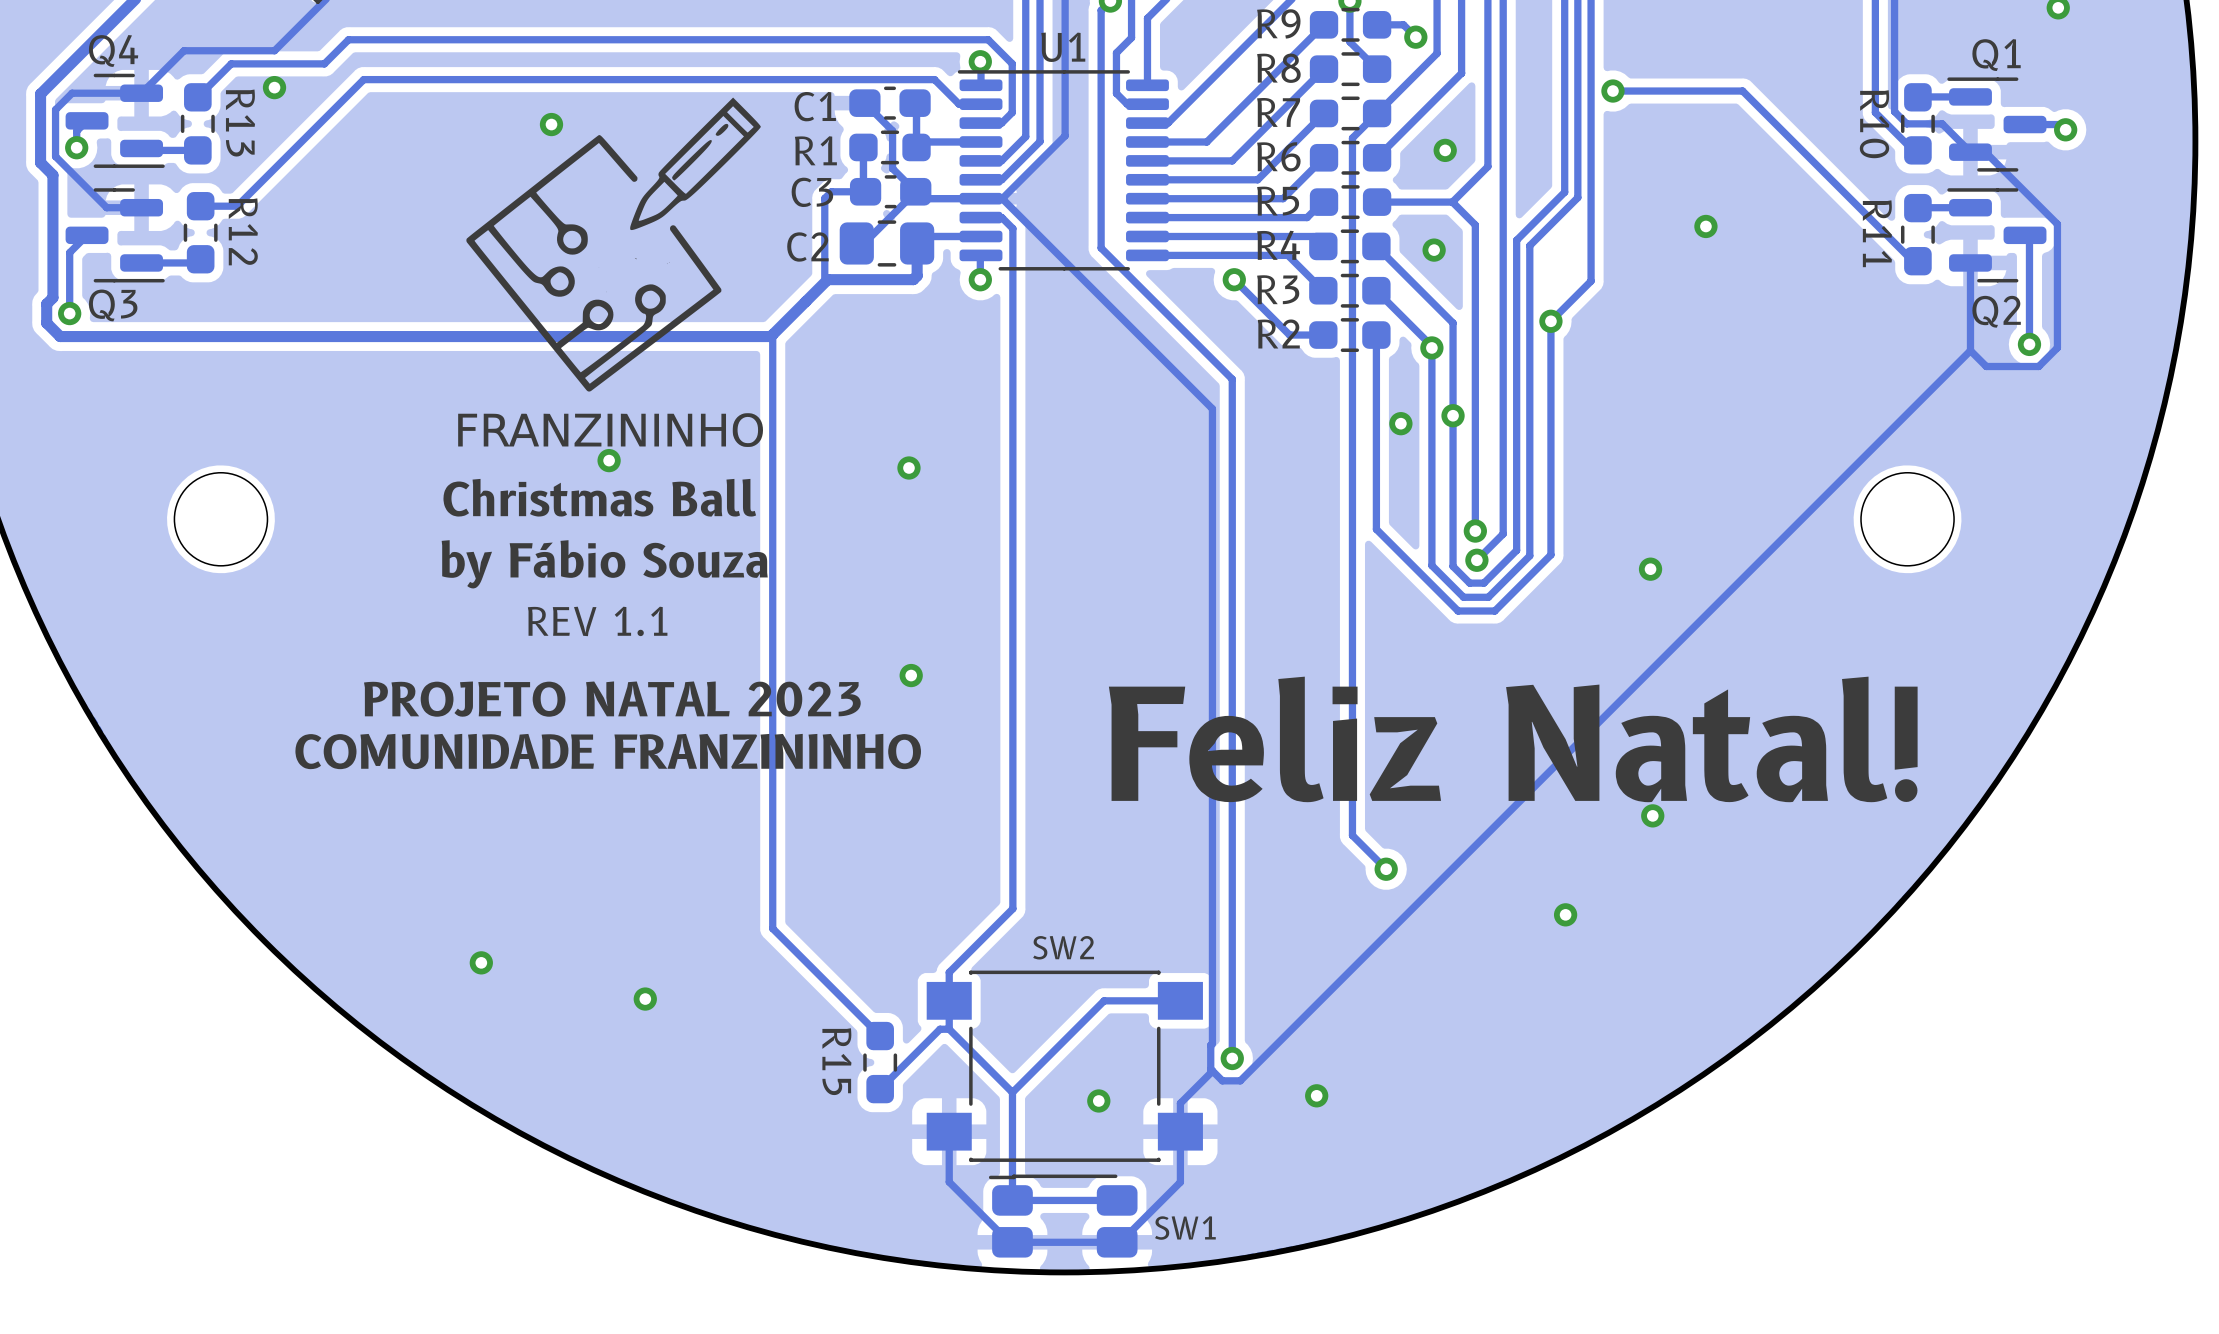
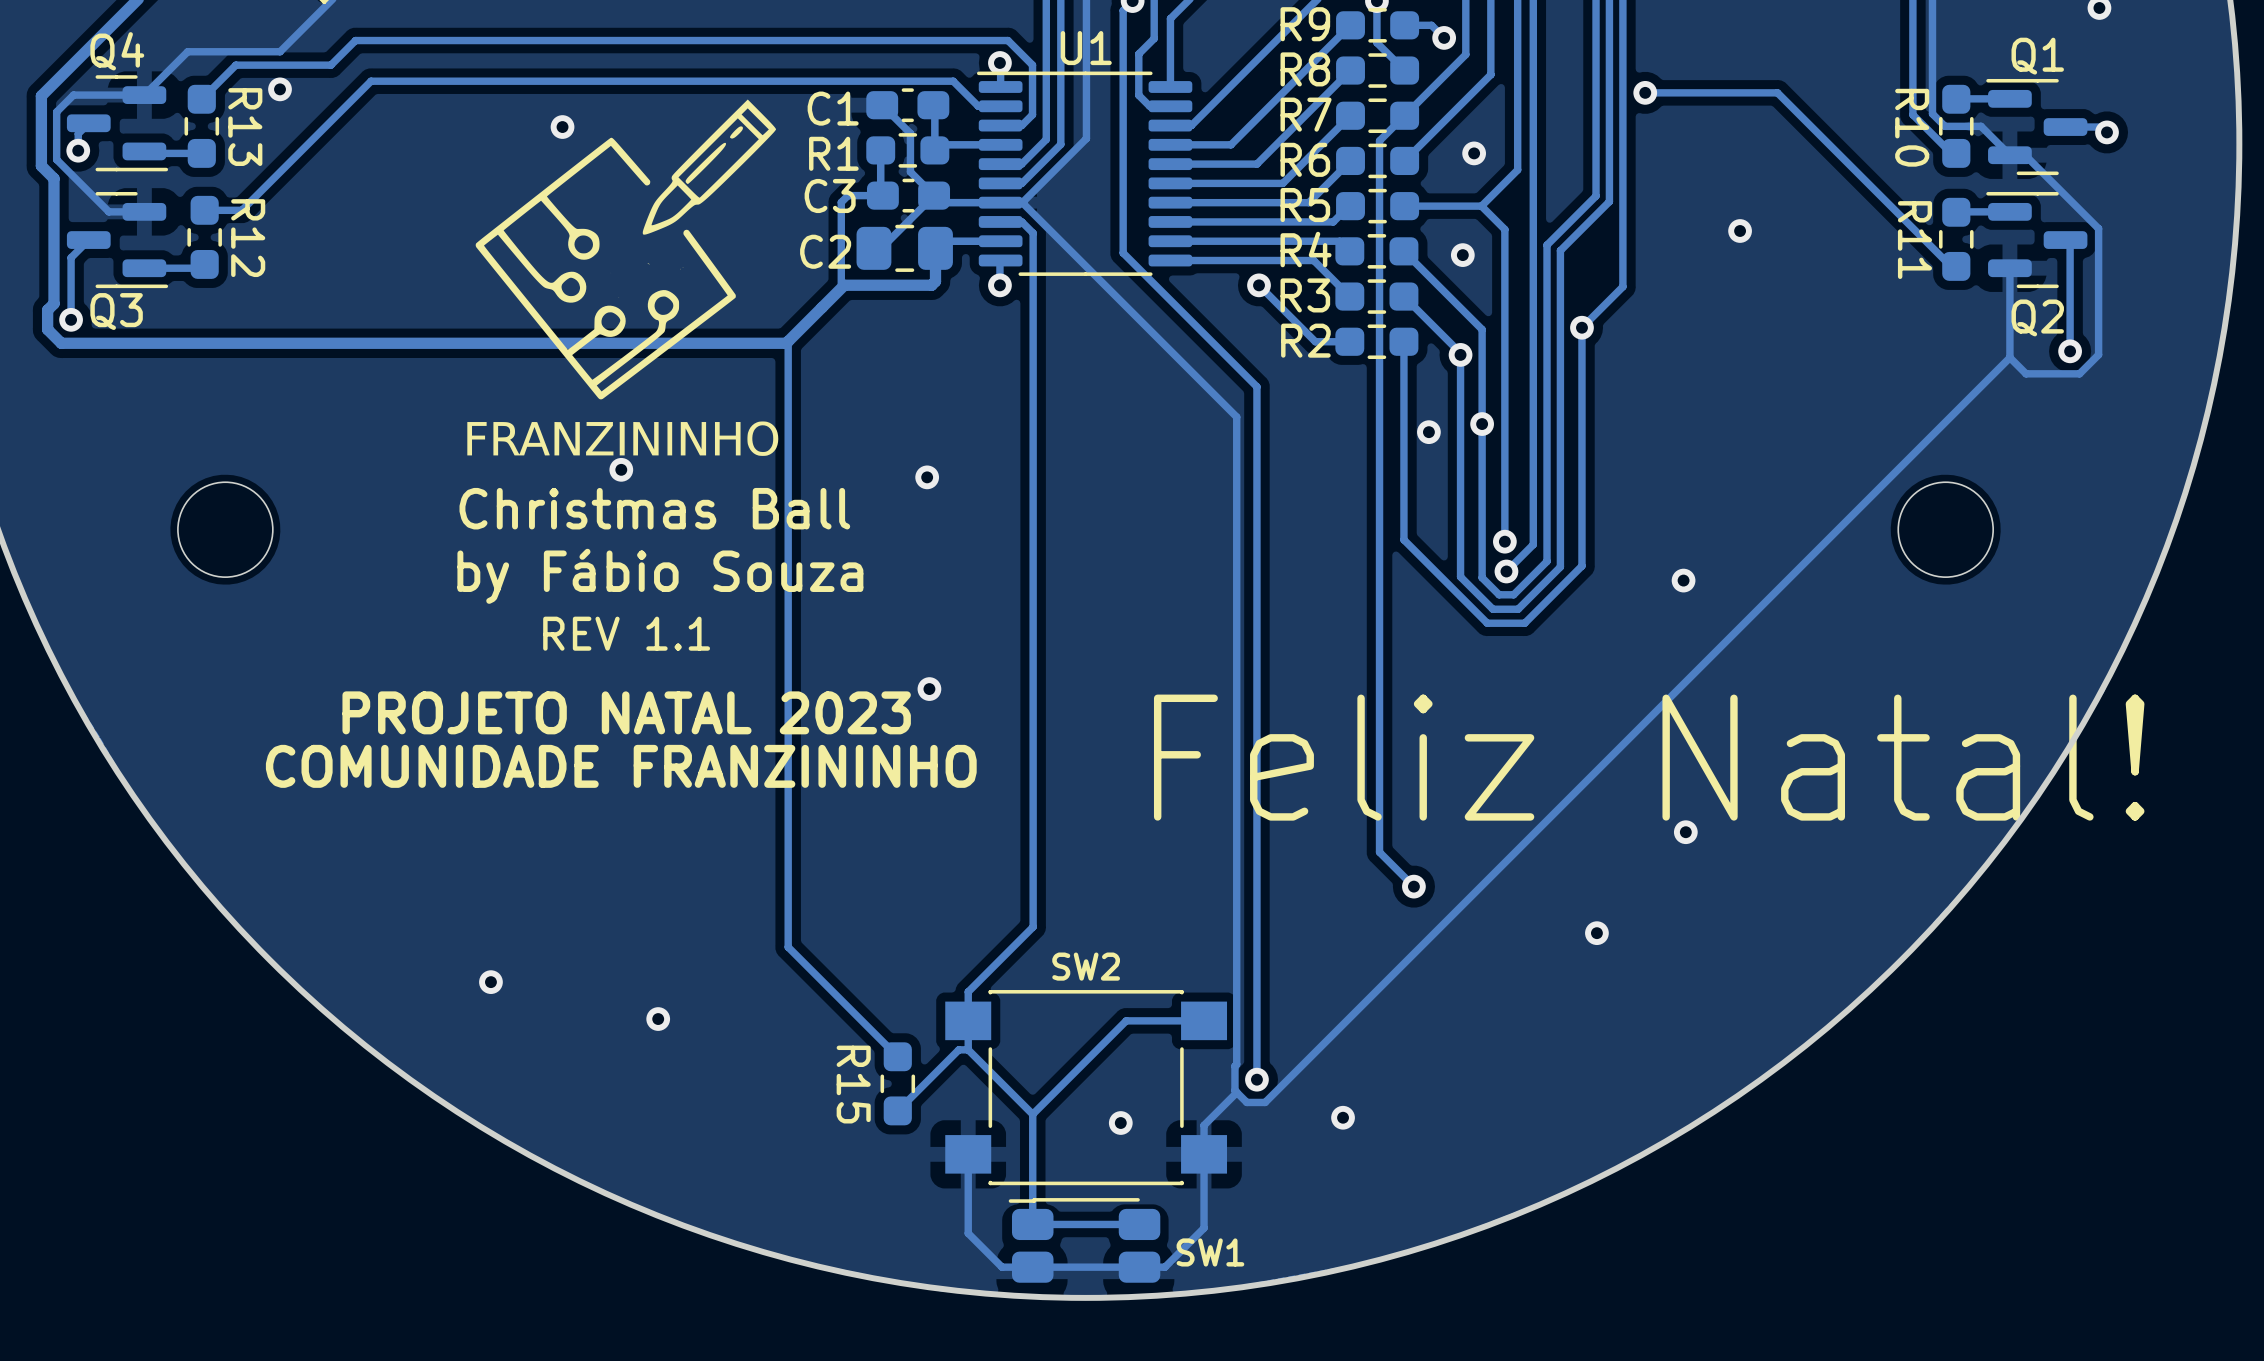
track: (949, 1182) (1009, 1242) -> (968, 1205) (968, 1233) (1002, 1267) (1029, 1267)
track: (1180, 1182) (1120, 1242) -> (1204, 1205) (1204, 1228) (1164, 1267) (1142, 1267)

